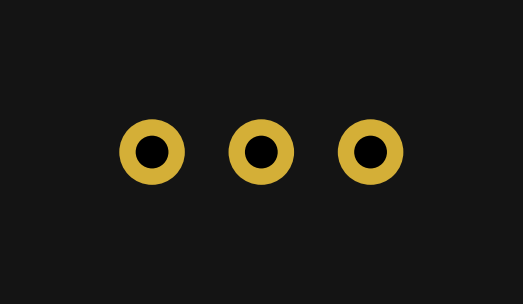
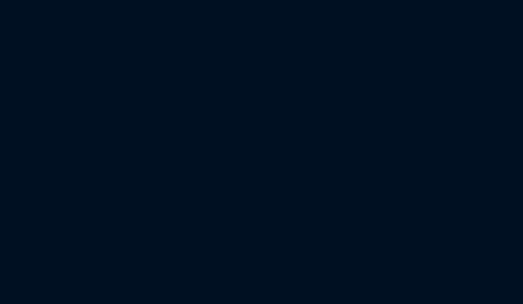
part: (261, 152) -> none

